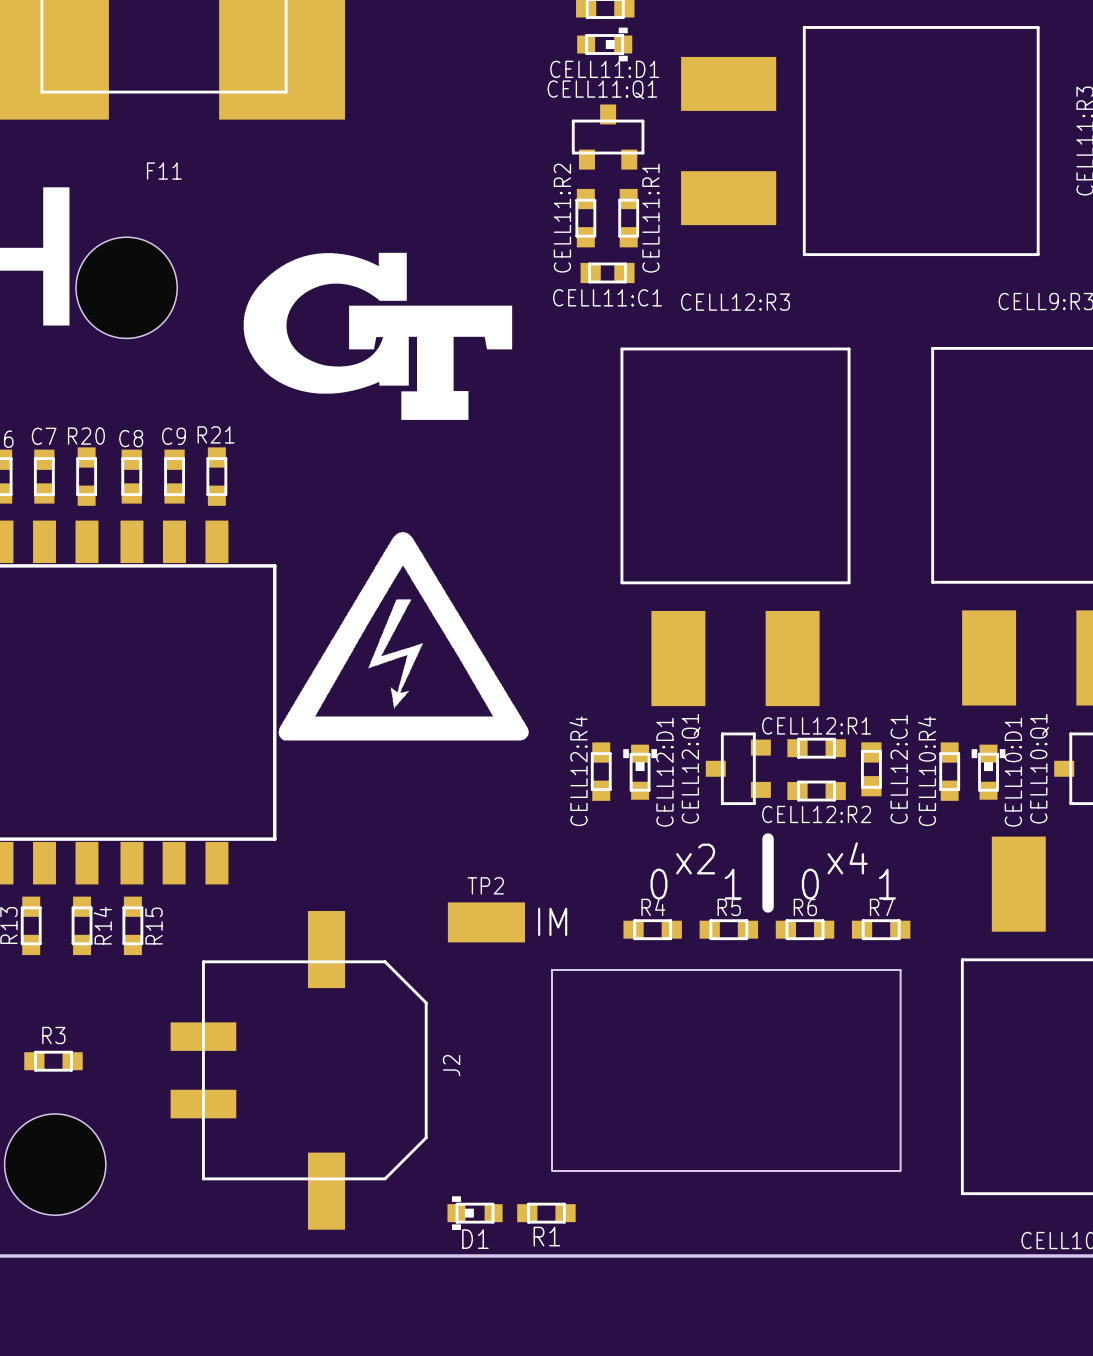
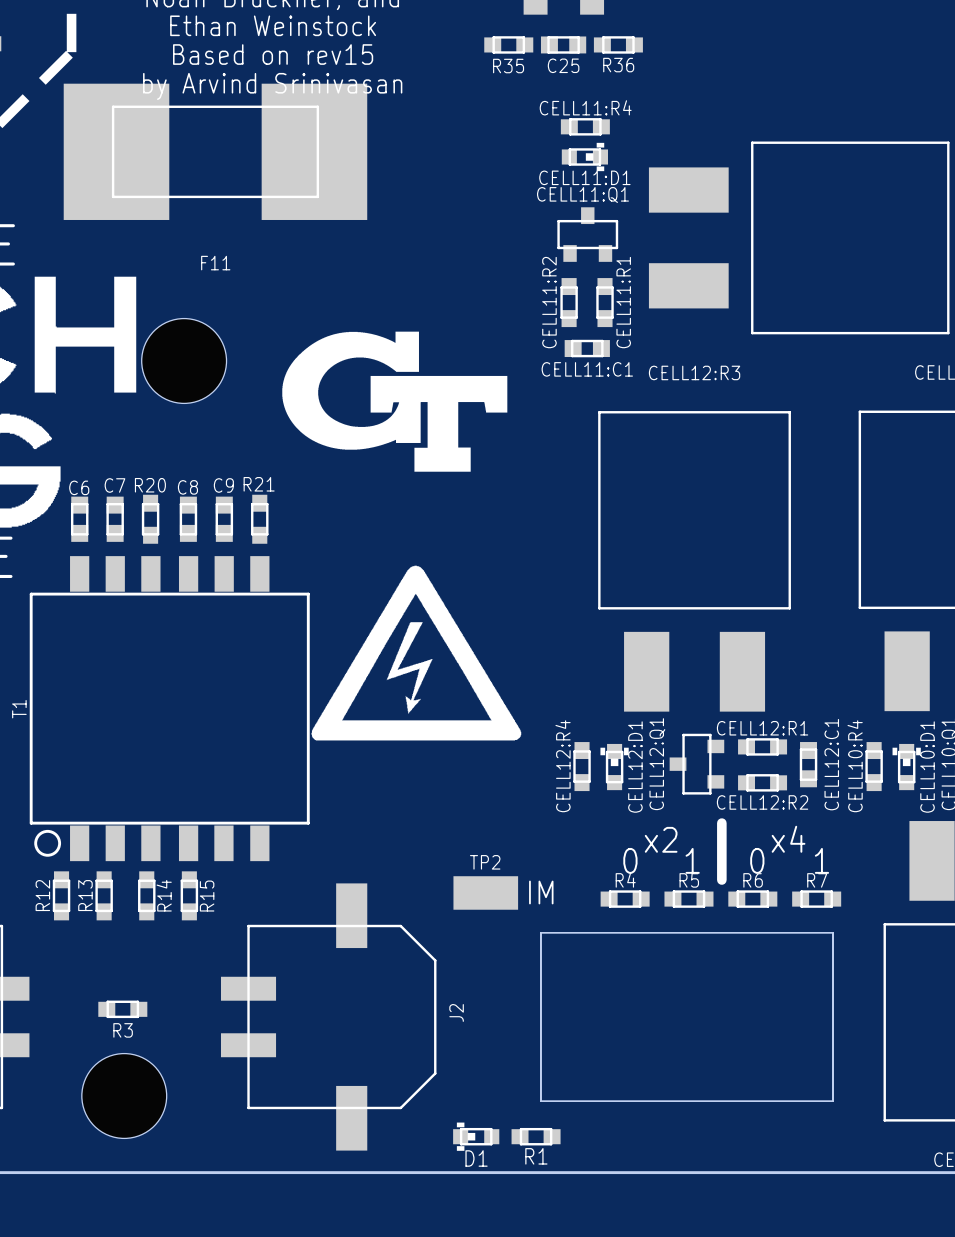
R3 name position: R3 (53, 1035) -> R3 (123, 1030)

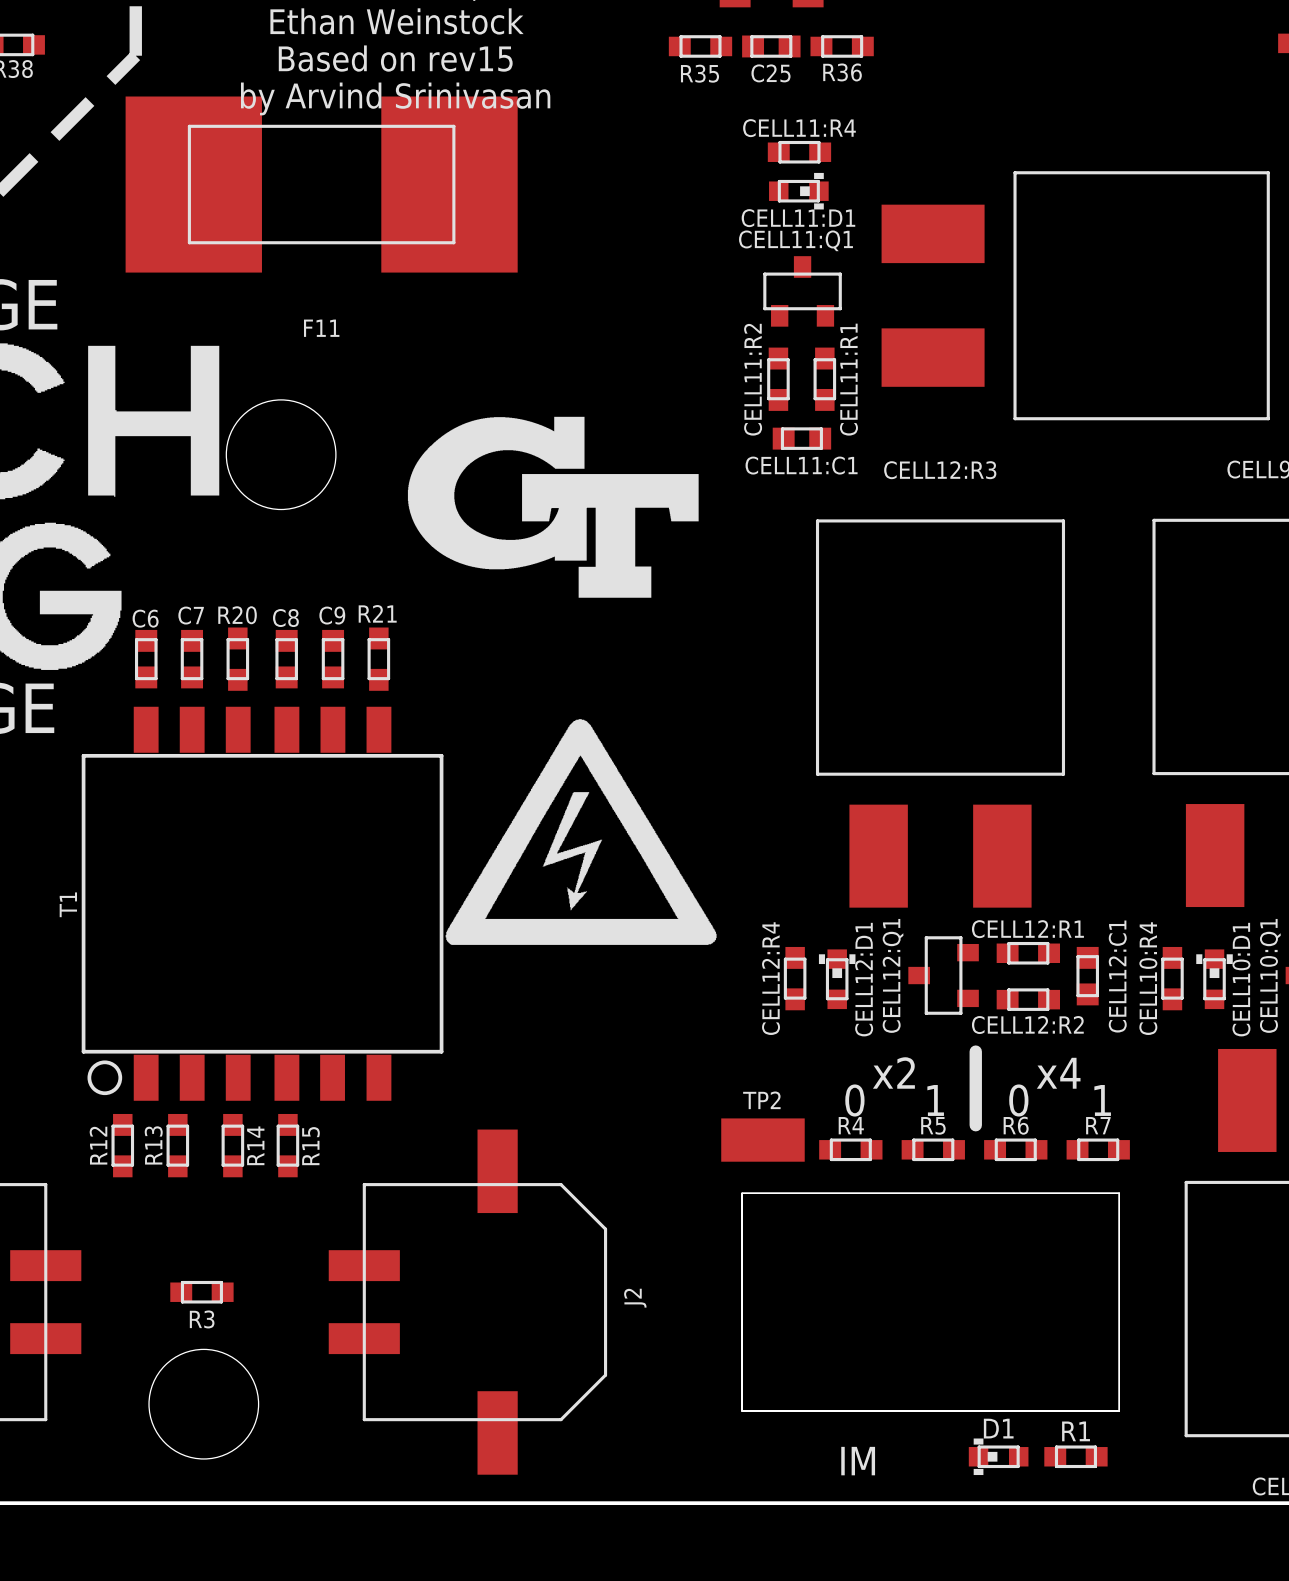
TP2 position: (485, 892) -> (762, 1140)
text position: IM (541, 892) -> IM (858, 1461)
D1 position: (476, 1136) -> (998, 1456)
R1 position: (536, 1136) -> (1075, 1456)
R1 name position: R1 (536, 1156) -> R1 (1076, 1431)
D1 name position: D1 (476, 1158) -> D1 (998, 1428)

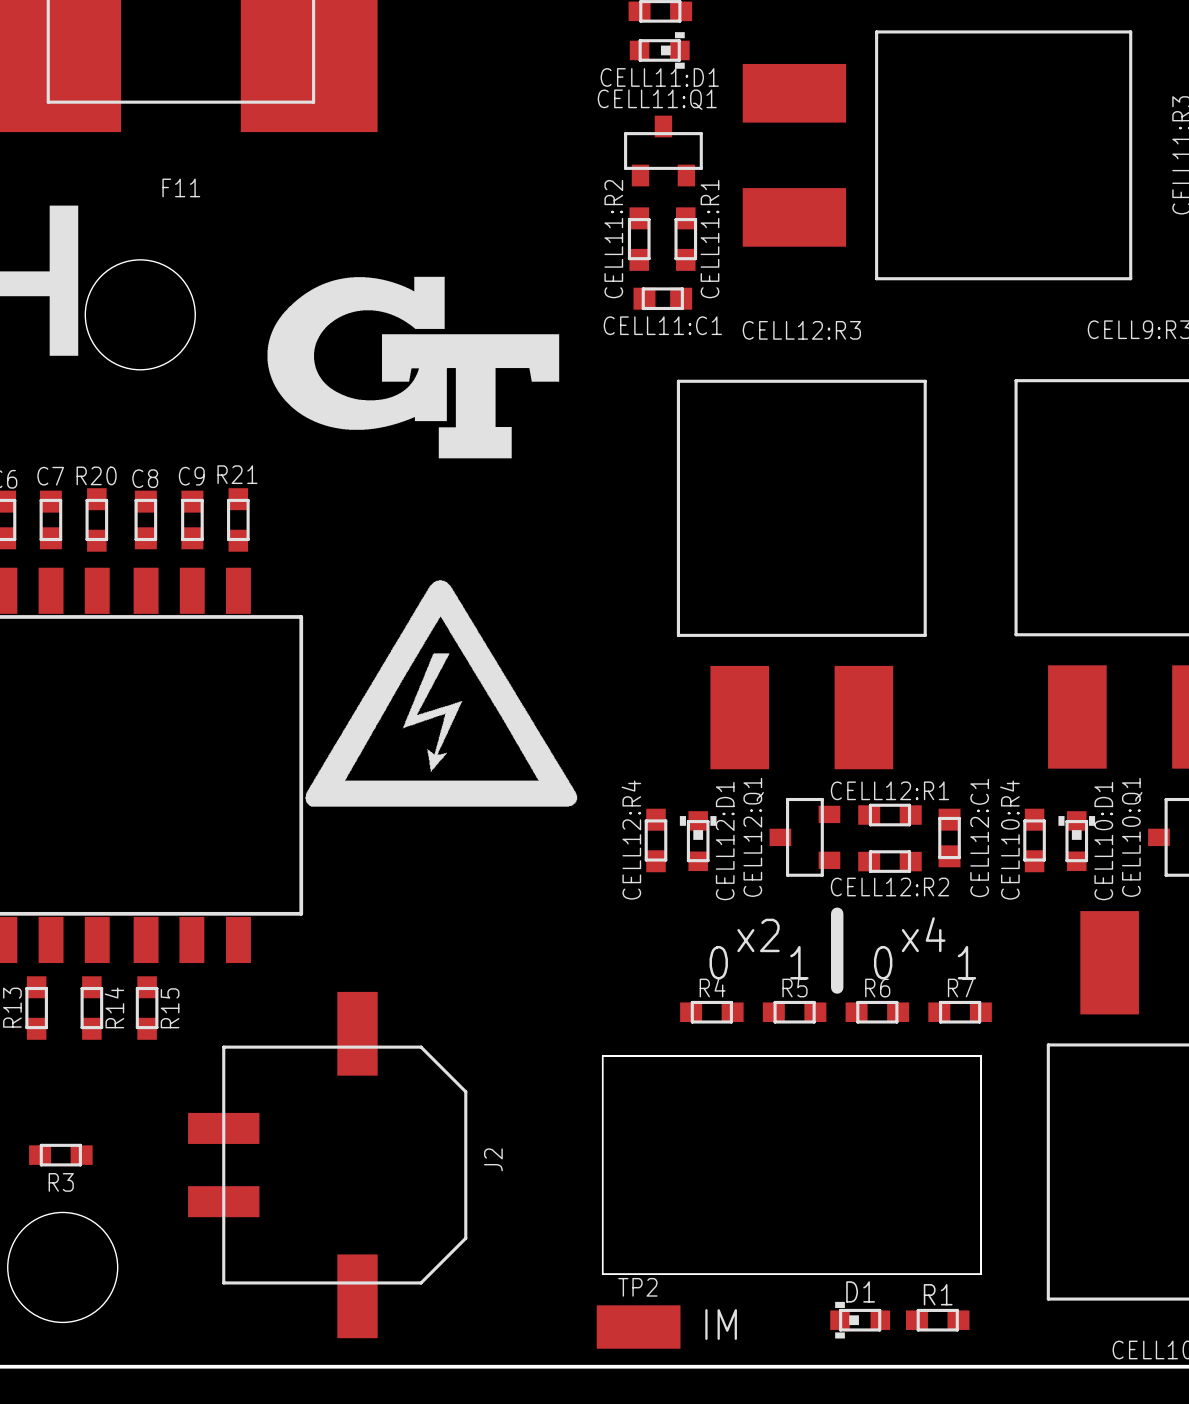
TP2 position: (762, 1140) -> (638, 1327)

